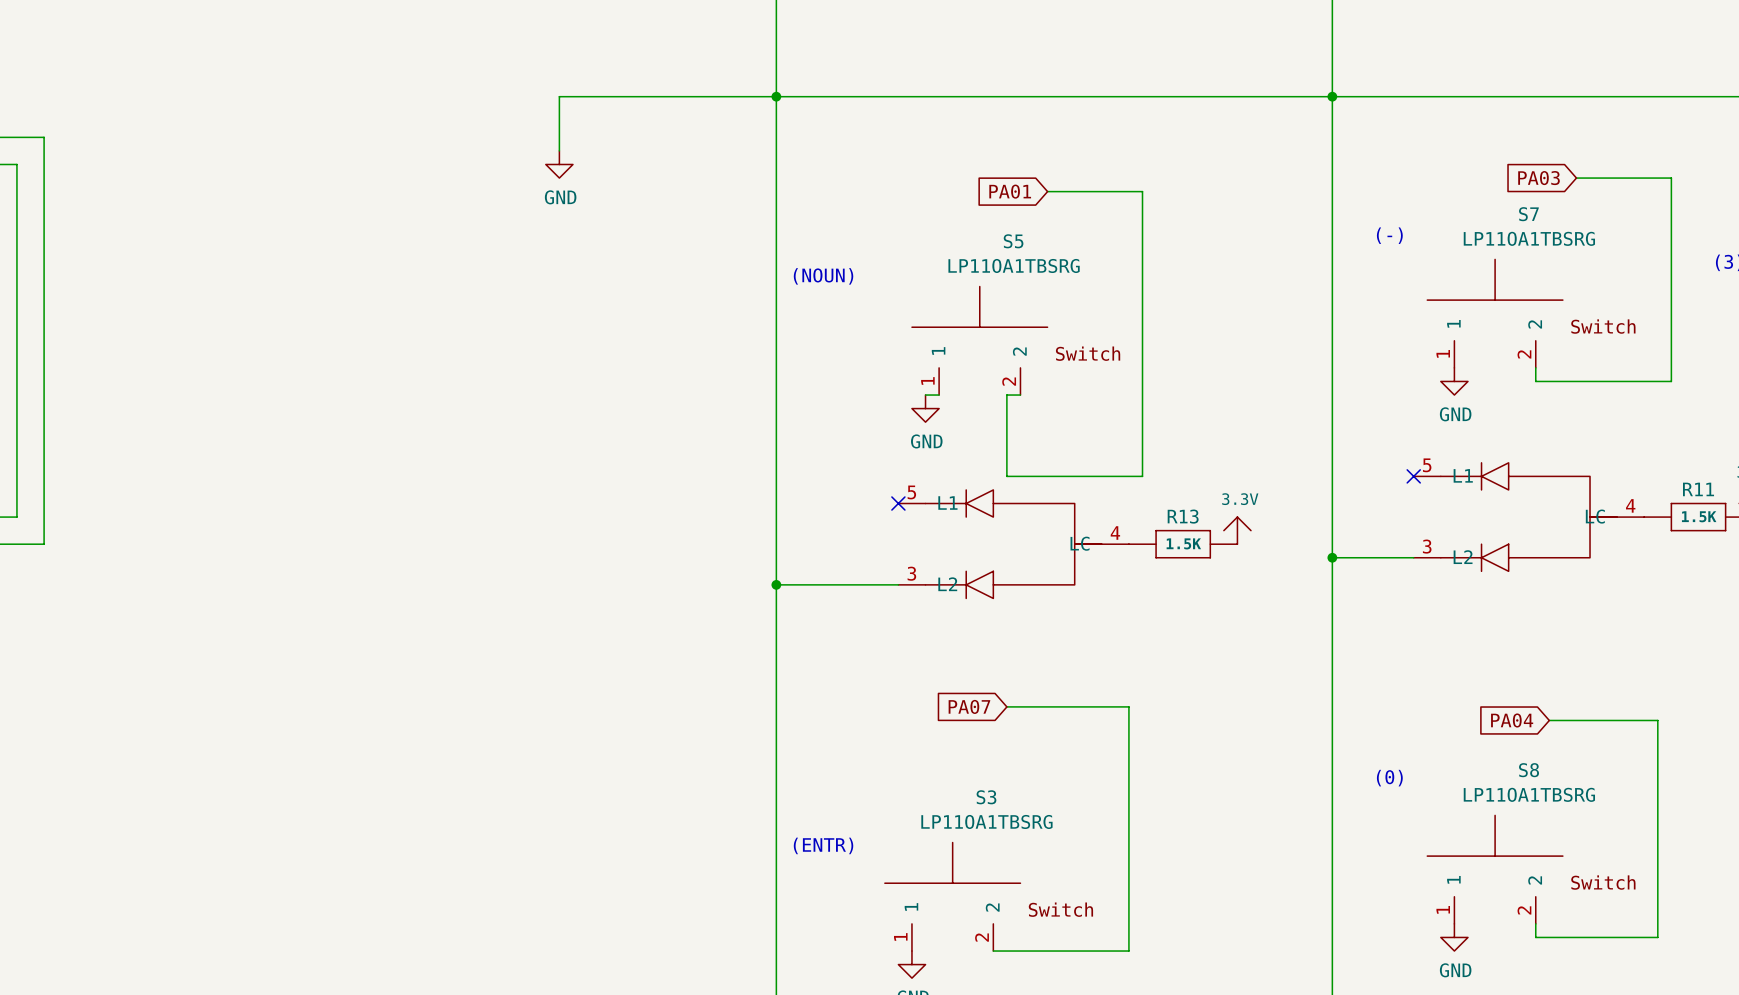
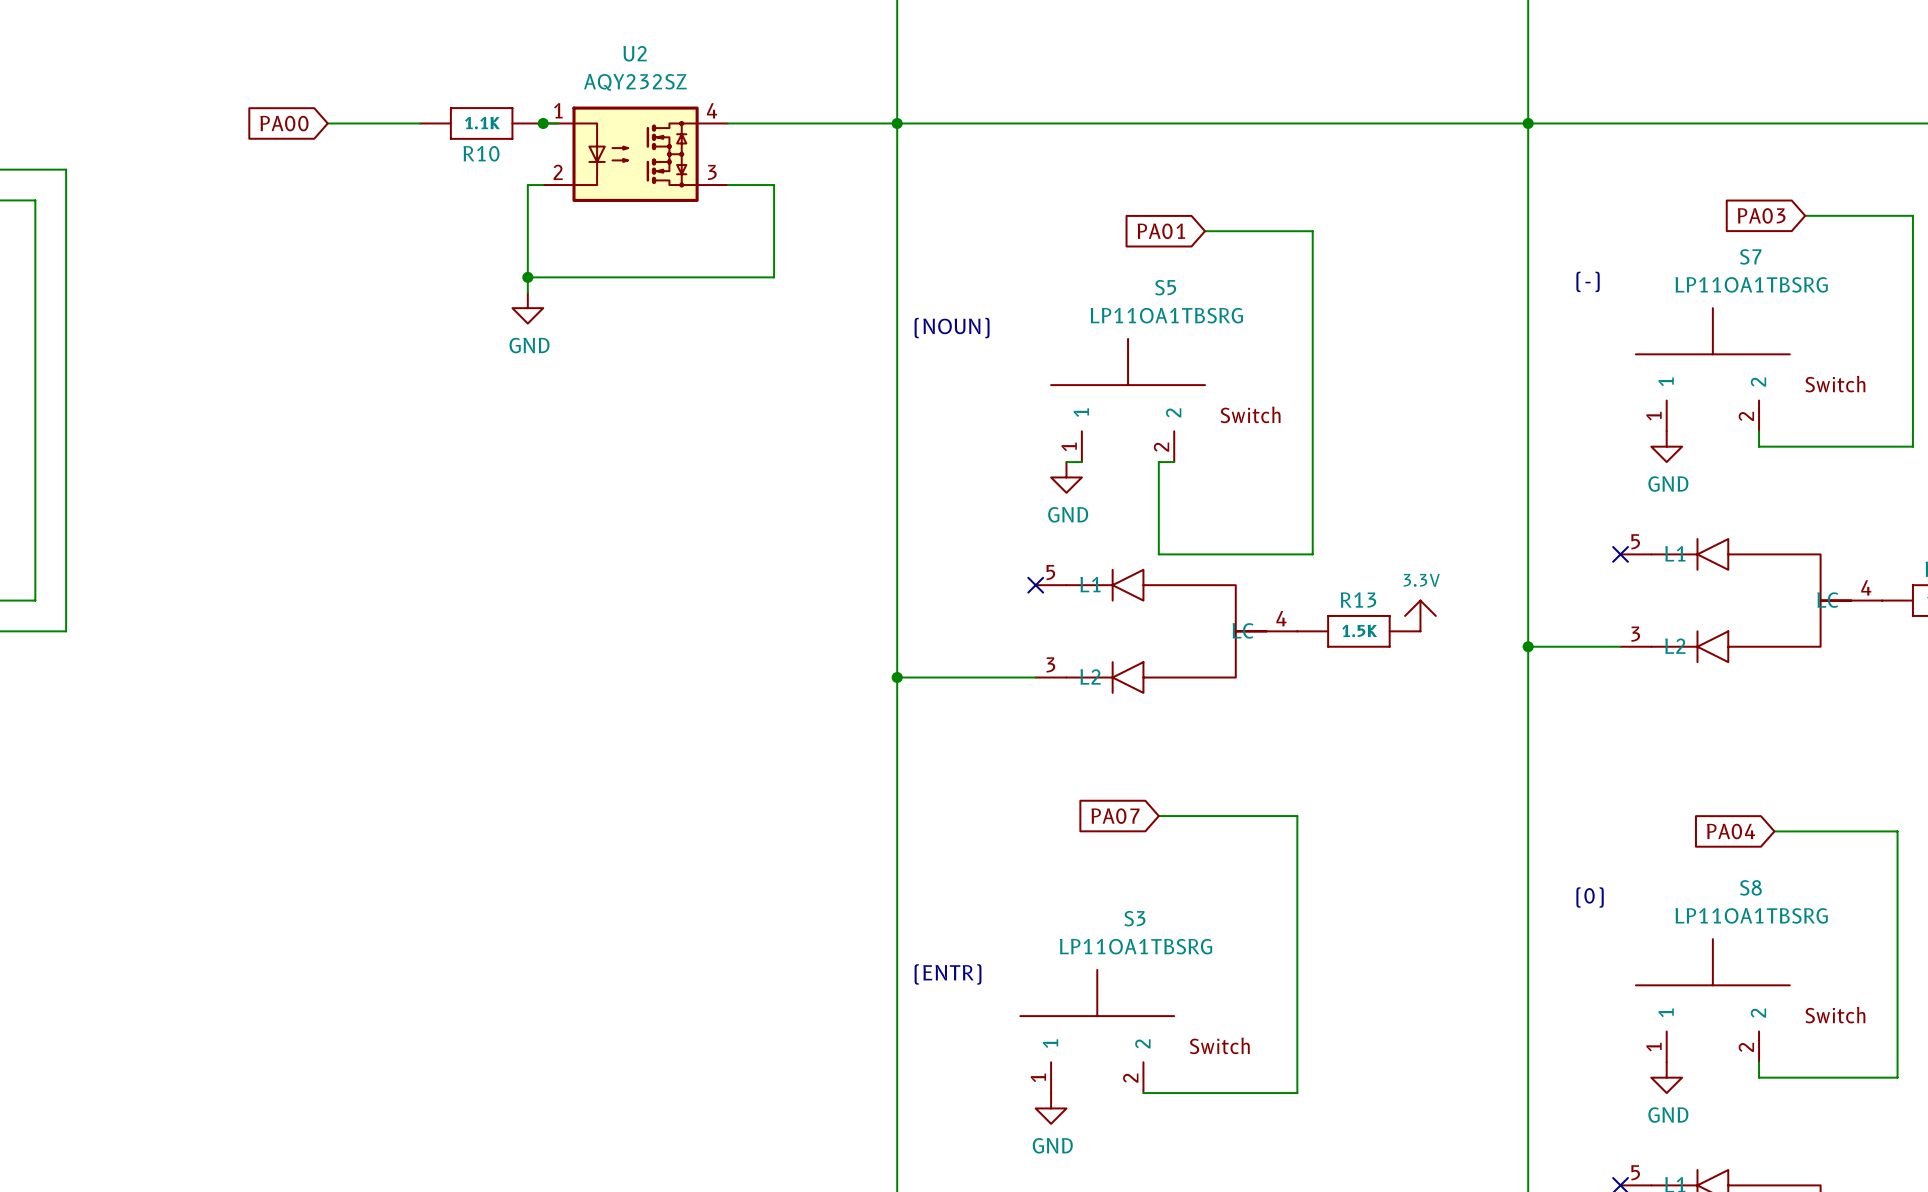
global label: none -> PA00 (284, 123)
wire: none -> (327, 123) (420, 123)
R10: none -> 1.1K (481, 123)
wire: none -> (543, 123) (558, 123)
junction: none -> (543, 123)
U2: none -> AQY232SZ (635, 154)
wire: none -> (543, 185) (527, 185) (527, 292)
wire: none -> (727, 185) (774, 185) (774, 277) (527, 277)
power symbol position: GND (559, 164) -> GND (527, 308)
junction: none -> (527, 277)

